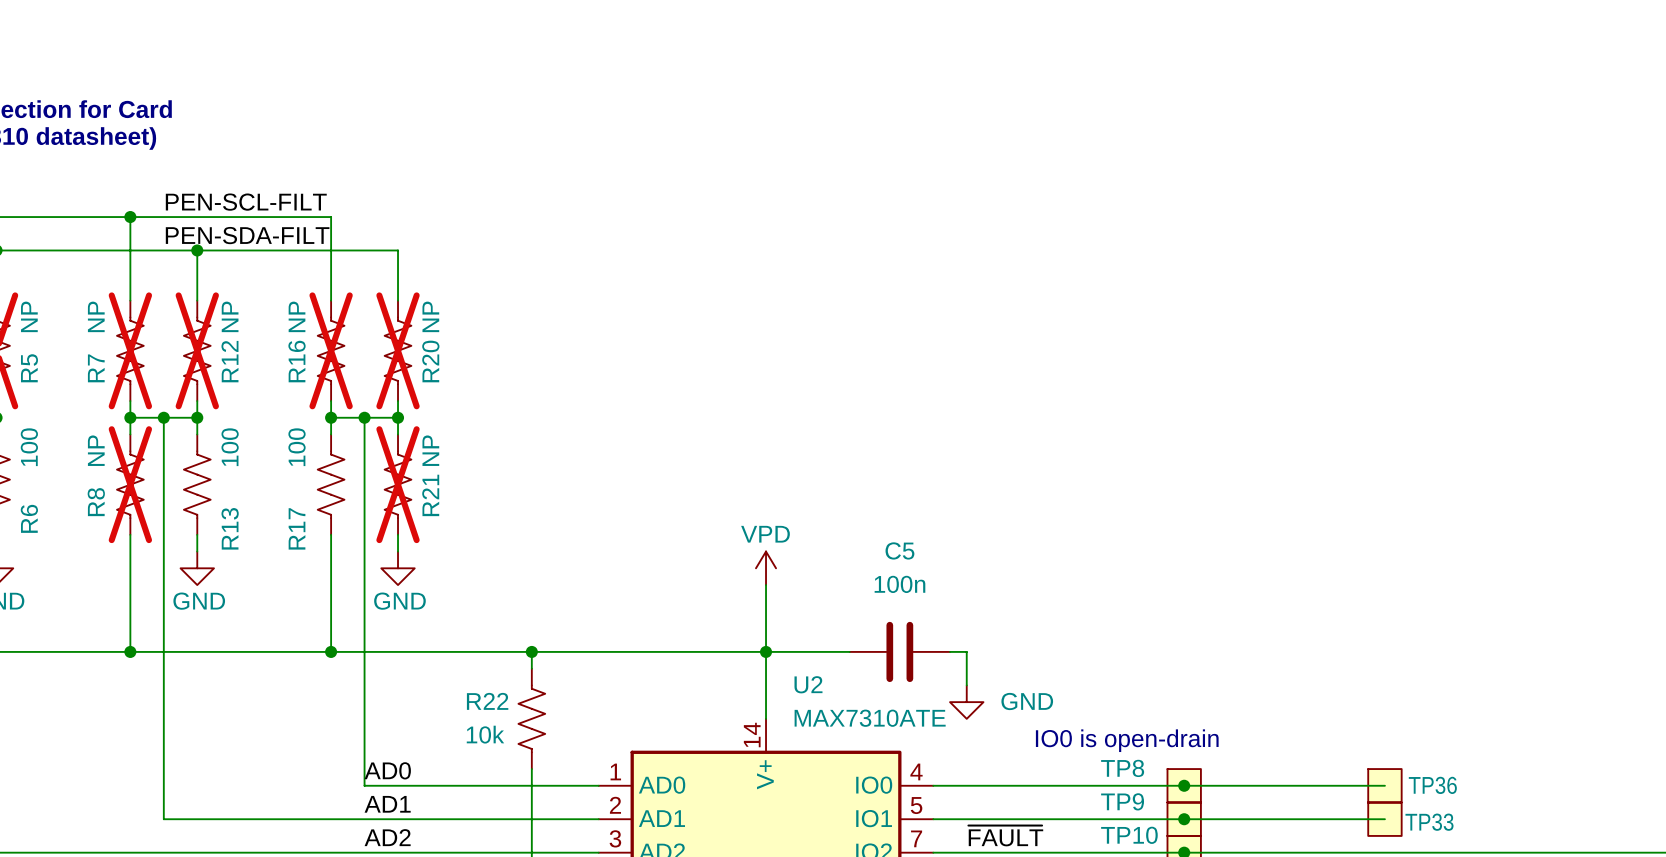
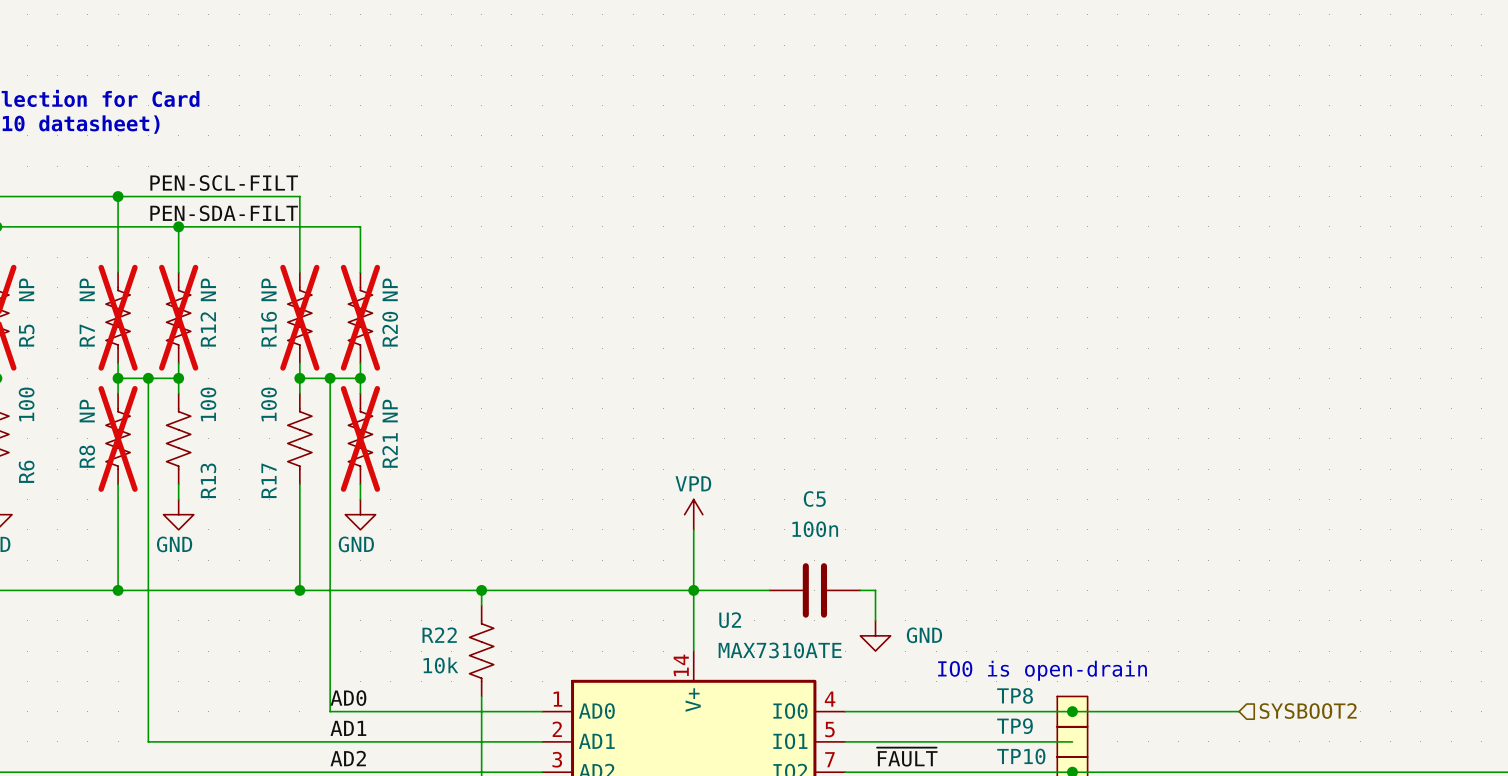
wire: (1368, 785) (1384, 785) -> none
TP36: (1384, 785) -> none
hierarchical label: none -> SYSBOOT2 (1308, 711)
wire: (1184, 819) (1384, 819) -> none
junction: (1184, 819) -> none
TP33: (1384, 819) -> none

